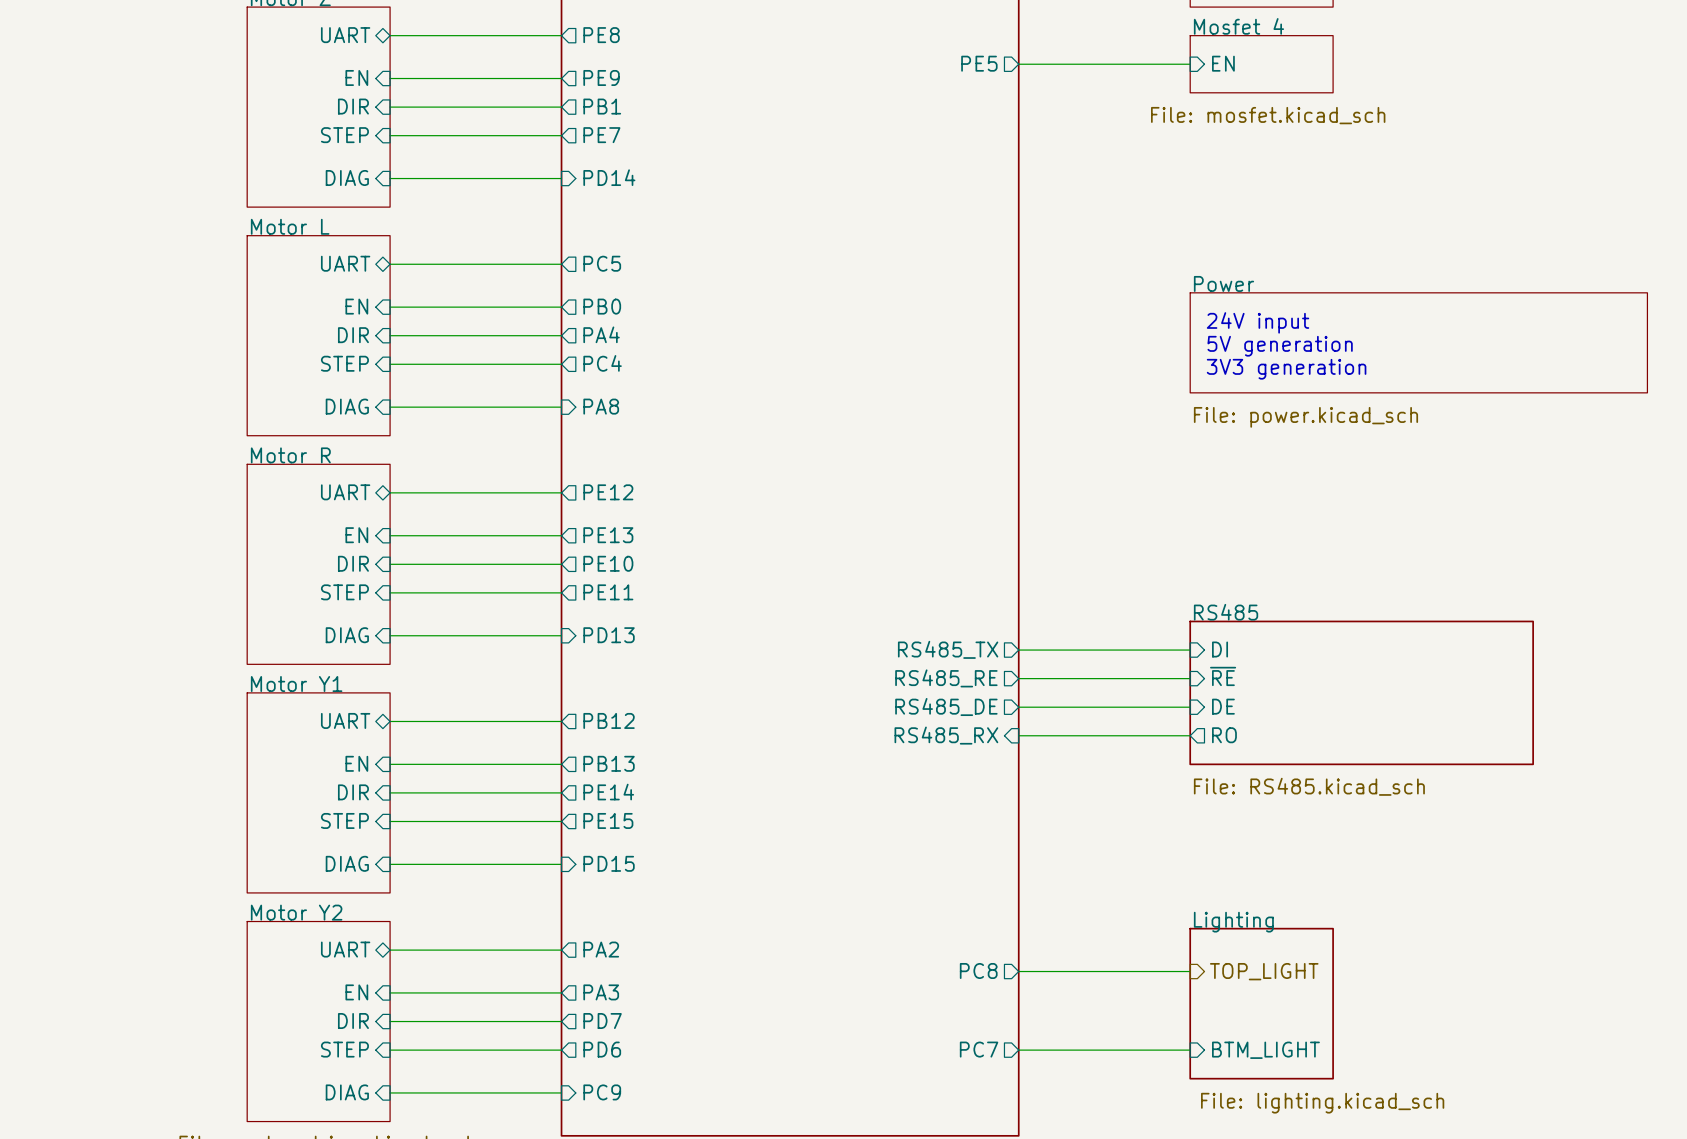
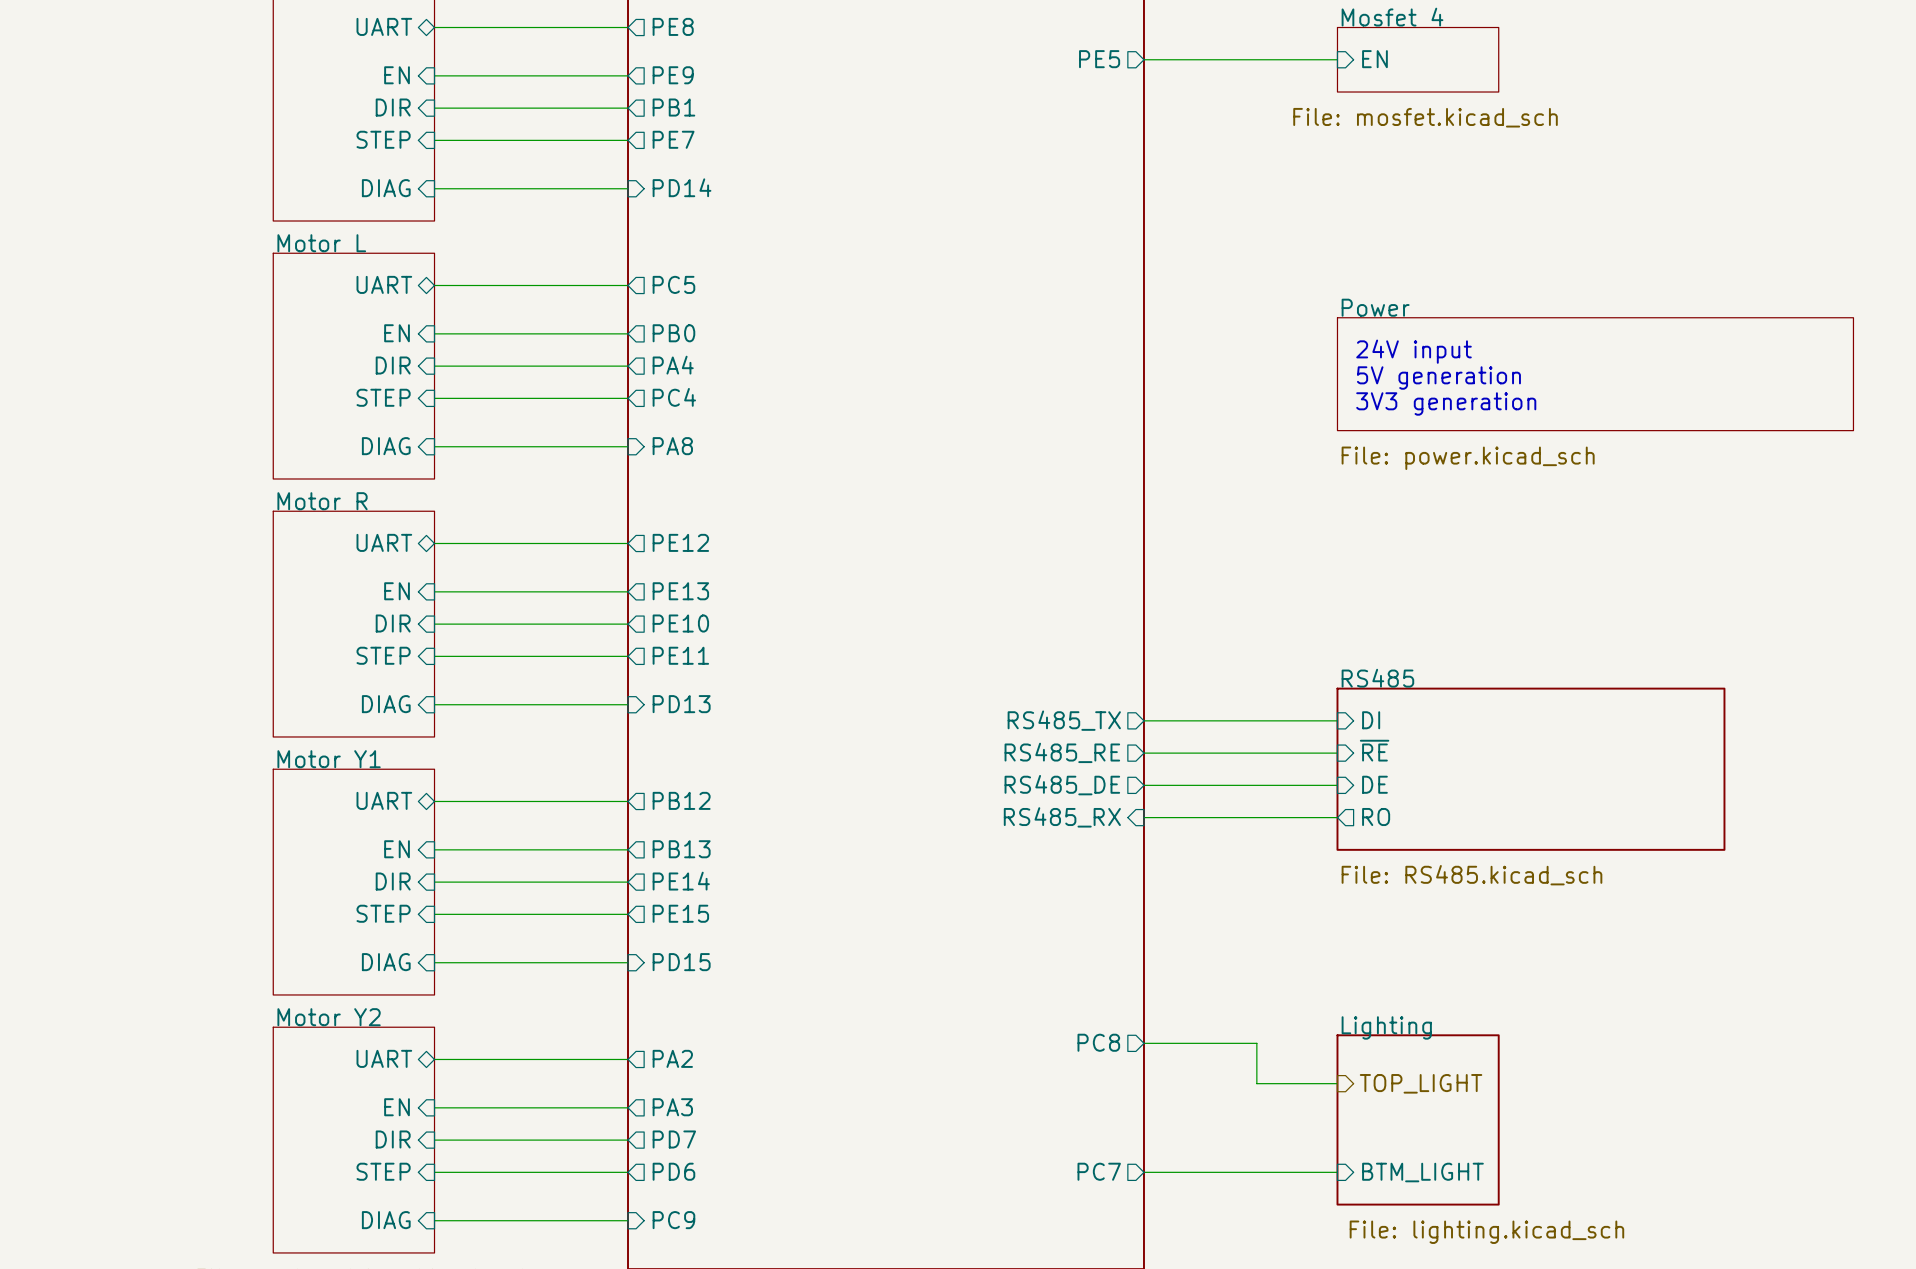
sheet pin position: PC8 (978, 970) -> PC8 (1098, 1042)
wire: (1018, 971) (1118, 971) -> (1143, 1043) (1256, 1043) (1256, 1083)

